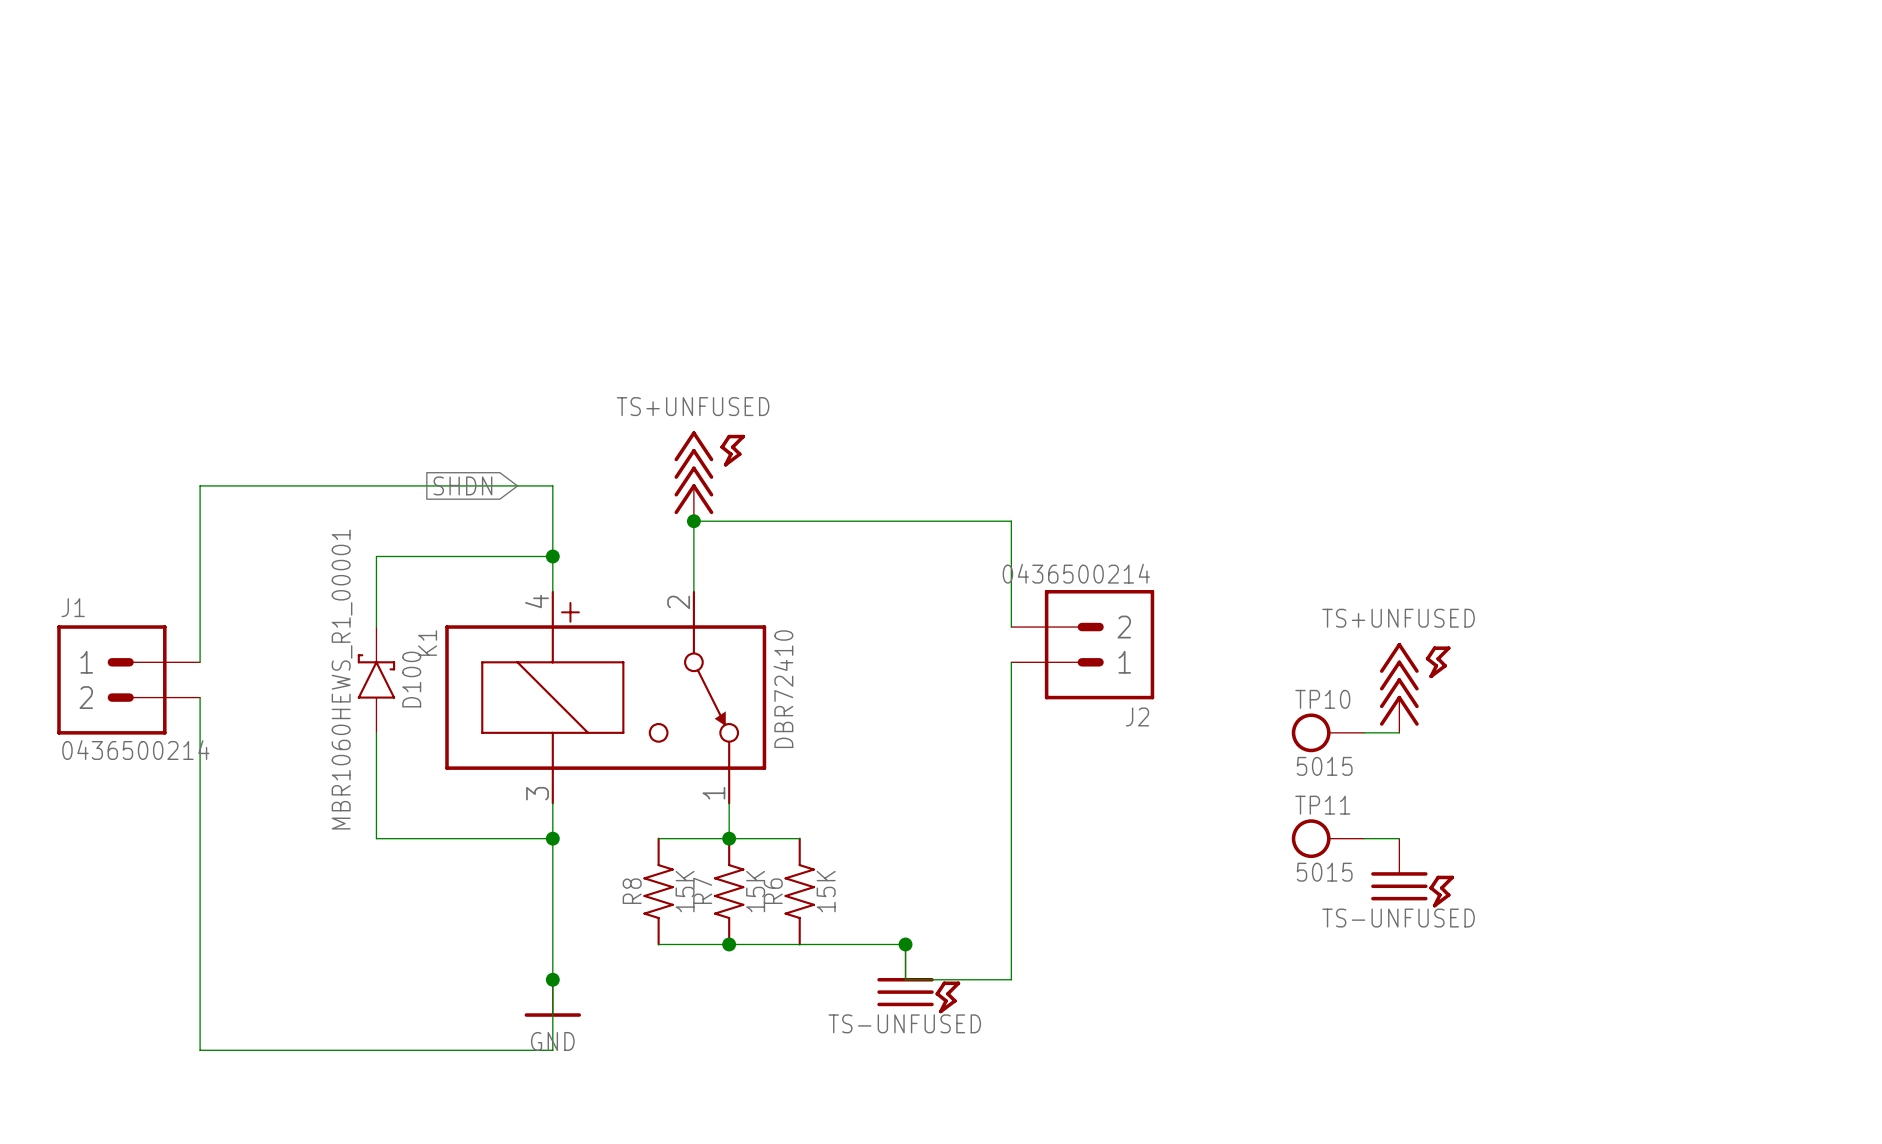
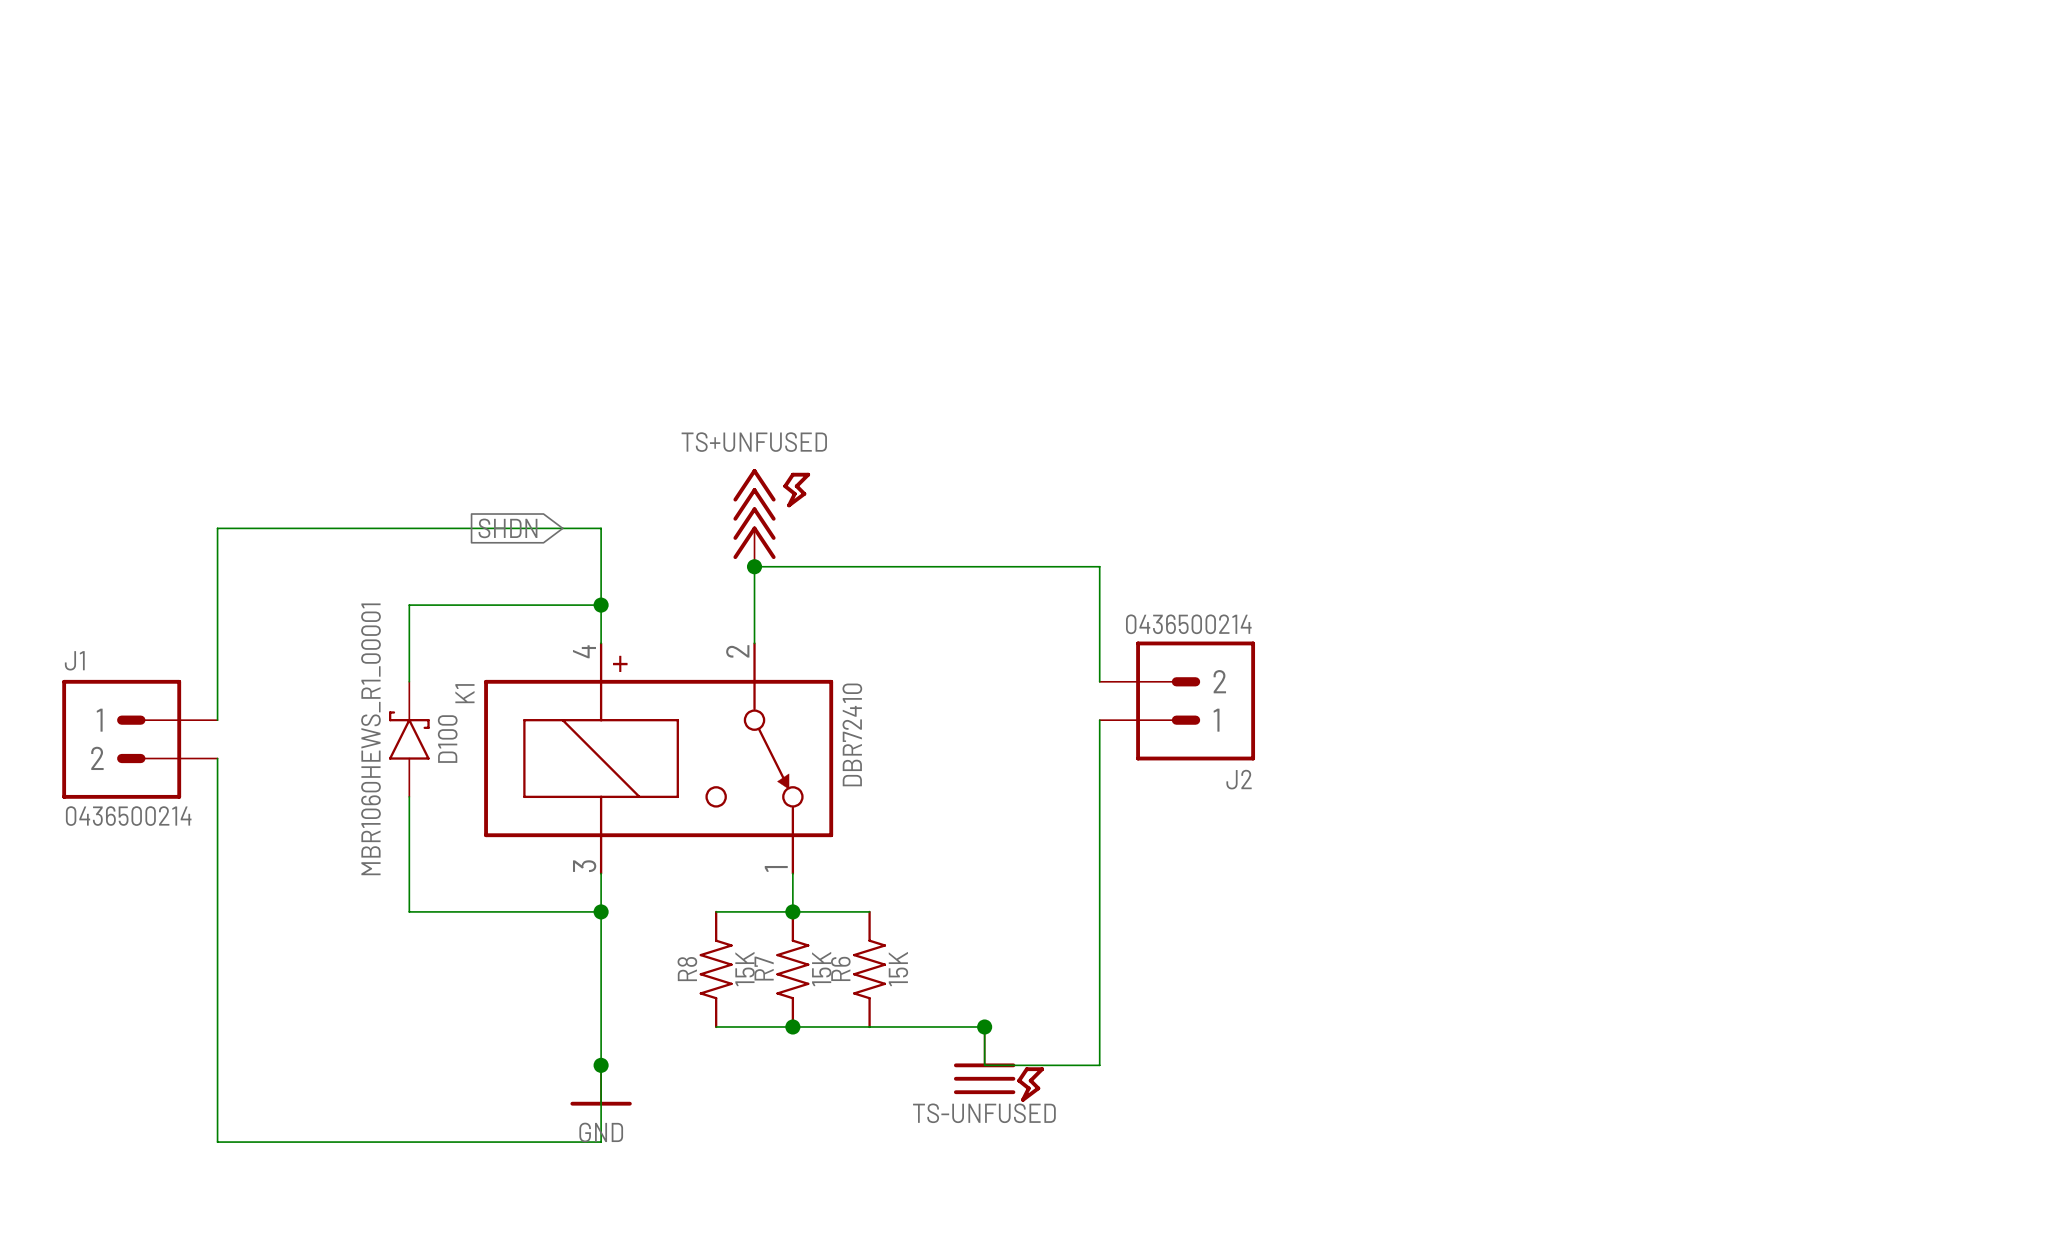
power symbol: TS+UNFUSED (1415, 687) -> none
TP10: (1327, 732) -> none
wire: (1364, 732) (1399, 732) -> none
TP11: (1327, 838) -> none
wire: (1364, 838) (1399, 838) -> none
power symbol: TS-UNFUSED (1412, 873) -> none

